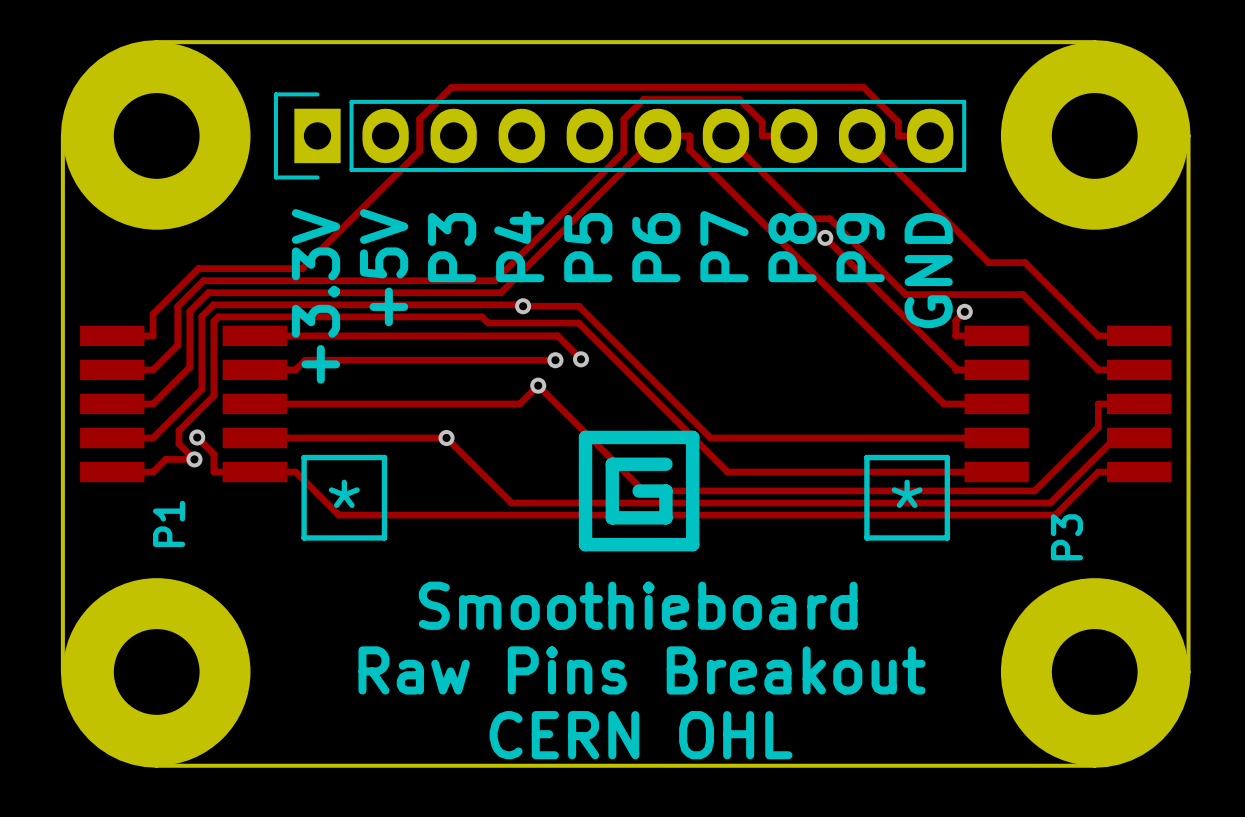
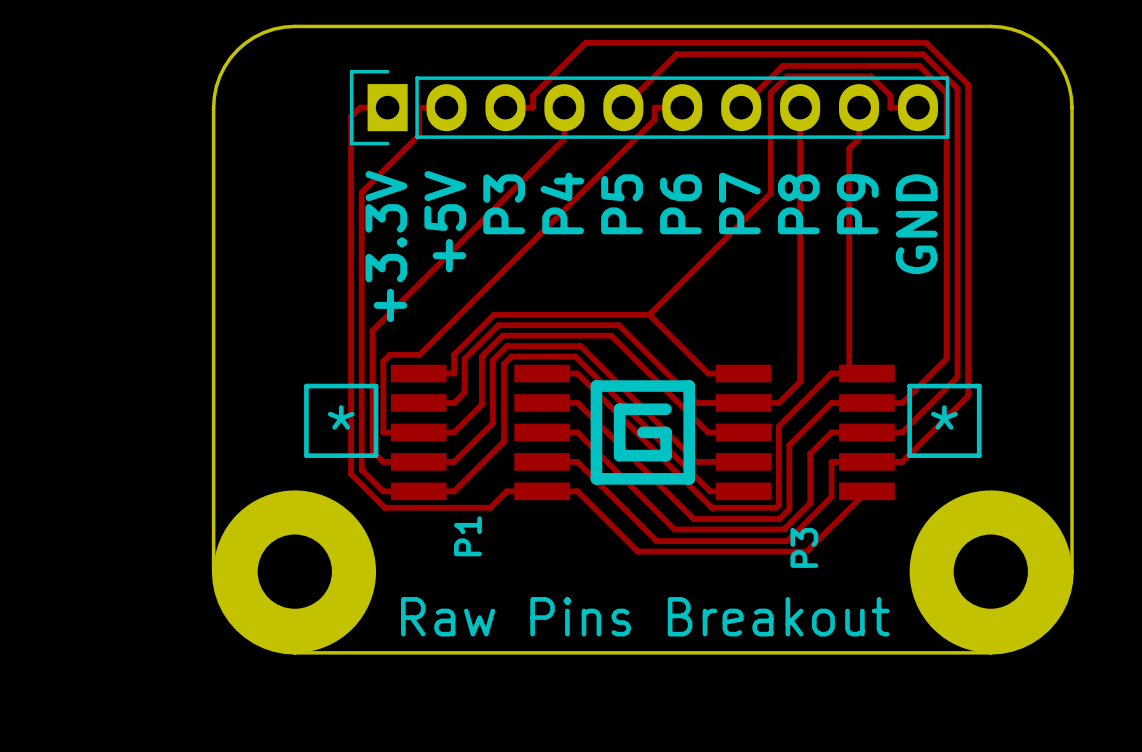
board edge: (290, 42) (156, 42) (132, 45) (120, 49) (109, 54) (90, 69) (75, 89) (66, 111) (62, 135) (62, 671) (66, 696) (70, 707) (75, 718) (90, 738) (109, 753) (132, 762) (156, 765) (290, 765) -> (294, 26) (263, 32) (237, 50) (219, 76) (213, 107) (214, 582) (224, 612) (237, 629) (263, 646) (294, 652)
part: (156, 135) -> none
track: none -> (387, 107) (360, 107) (351, 116) (351, 474) (384, 507) (490, 507) (506, 491) (577, 491) (637, 551) (806, 551) (866, 491)
track: none -> (446, 107) (418, 107) (418, 135) (361, 192) (361, 469) (383, 491) (454, 491) (504, 441) (504, 363) (511, 356) (575, 356) (710, 491) (743, 491)
track: none -> (505, 107) (533, 107) (533, 95) (585, 42) (926, 42) (968, 84) (968, 396) (902, 461) (831, 461) (831, 496) (787, 541) (656, 541) (577, 461) (542, 461)
track: none -> (564, 107) (564, 138) (372, 330) (372, 451) (383, 461) (454, 461) (492, 423) (492, 360) (507, 346) (580, 346) (696, 461) (743, 461)
part position: (620, 135) -> (649, 107)
track: none -> (623, 107) (676, 54) (923, 54) (957, 88) (957, 377) (902, 432) (831, 432) (810, 453) (810, 503) (783, 529) (674, 529) (577, 432) (542, 432)
track: (725, 135) (808, 218) (829, 218) (905, 294) (1023, 294) (1098, 369) (1139, 369) -> none
track: none -> (682, 107) (654, 107) (654, 119) (419, 354) (389, 354) (383, 361) (383, 432) (454, 432) (481, 404) (481, 356) (502, 335) (611, 335) (708, 432) (743, 432)
track: (794, 135) (762, 135) (762, 121) (739, 99) (643, 99) (623, 119) (623, 152) (495, 280) (203, 280) (177, 306) (177, 345) (153, 369) (112, 369) -> none
track: none -> (741, 107) (782, 65) (919, 65) (946, 92) (946, 358) (902, 402) (831, 402) (789, 445) (789, 509) (779, 518) (693, 518) (577, 402) (542, 402)
track: (862, 135) (988, 262) (1025, 262) (1098, 335) (1139, 335) -> none
track: none -> (800, 107) (800, 381) (778, 402) (696, 402) (619, 325) (498, 325) (464, 359) (464, 392) (454, 402) (418, 402)
track: (930, 135) (898, 135) (898, 121) (863, 87) (451, 87) (419, 119) (419, 151) (302, 268) (198, 268) (153, 314) (153, 335) (112, 335) -> none
track: none -> (859, 107) (859, 138) (849, 148) (849, 373)
track: none -> (917, 107) (890, 107) (890, 95) (871, 76) (787, 76) (770, 92) (770, 193) (649, 314)
part: (1094, 135) -> none
track: (825, 237) (955, 369) (996, 369) -> none
via: (825, 237) -> none
text position: P4 (519, 246) -> P4 (562, 203)
text position: P7 (724, 246) -> P7 (739, 203)
text position: P3 (452, 247) -> P3 (504, 204)
text position: P5 (588, 247) -> P5 (622, 204)
text position: P6 (656, 247) -> P6 (680, 204)
text position: P8 (792, 247) -> P8 (798, 204)
text position: P9 (860, 247) -> P9 (857, 204)
text position: +5V (384, 267) -> +5V (445, 221)
text position: GND (928, 270) -> GND (916, 224)
text position: +3.3V (316, 296) -> +3.3V (386, 246)
via: (523, 306) -> none
track: (964, 311) (955, 320) (955, 335) (996, 335) -> none
via: (964, 311) -> none
track: (254, 335) (557, 335) (580, 359) -> none
via: (580, 359) -> none
track: (555, 360) (305, 360) (295, 369) (254, 369) -> none
via: (555, 360) -> none
track: none -> (649, 314) (708, 373) (743, 373)
track: none -> (649, 314) (493, 314) (454, 354) (454, 373) (418, 373)
via: (538, 385) -> none
track: (112, 403) (153, 403) (189, 367) (189, 311) (208, 292) (501, 292) (657, 135) (689, 135) (689, 149) (943, 403) (996, 403) -> none
P1 position: (183, 403) -> (480, 432)
track: (254, 403) (519, 403) (538, 385) (643, 490) (1034, 490) (1098, 427) (1098, 403) (1139, 403) -> none
P3 position: (1067, 403) -> (805, 432)
track: (112, 437) (153, 437) (201, 389) (201, 316) (213, 304) (578, 306) (710, 437) (996, 437) -> none
track: (197, 437) (213, 454) (213, 472) (295, 472) (338, 515) (1055, 515) (1098, 472) (1139, 472) -> none
via: (197, 437) -> none
track: (254, 437) (446, 437) (511, 503) (1050, 503) (1115, 437) (1139, 437) -> none
via: (446, 437) -> none
track: none -> (542, 373) (577, 373) (711, 507) (776, 507) (778, 504) (778, 426) (831, 373) (866, 373)
line: (866, 457) (866, 537) (947, 537) (947, 457) (866, 457) -> (909, 386) (909, 455) (979, 455) (979, 386) (909, 386)
via: (194, 459) -> none
track: (112, 472) (153, 472) (165, 459) (194, 459) (178, 443) (178, 430) (213, 395) (213, 321) (218, 316) (481, 316) (488, 323) (578, 323) (727, 472) (996, 472) -> none
drawing position: (639, 491) -> (642, 432)
text position: * (907, 493) -> * (944, 417)
text: Smoothieboard (638, 605) -> none
text position: Raw Pins Breakout (641, 670) -> Raw Pins Breakout (645, 616)
part position: (156, 671) -> (294, 571)
text: CERN OHL (641, 735) -> none

